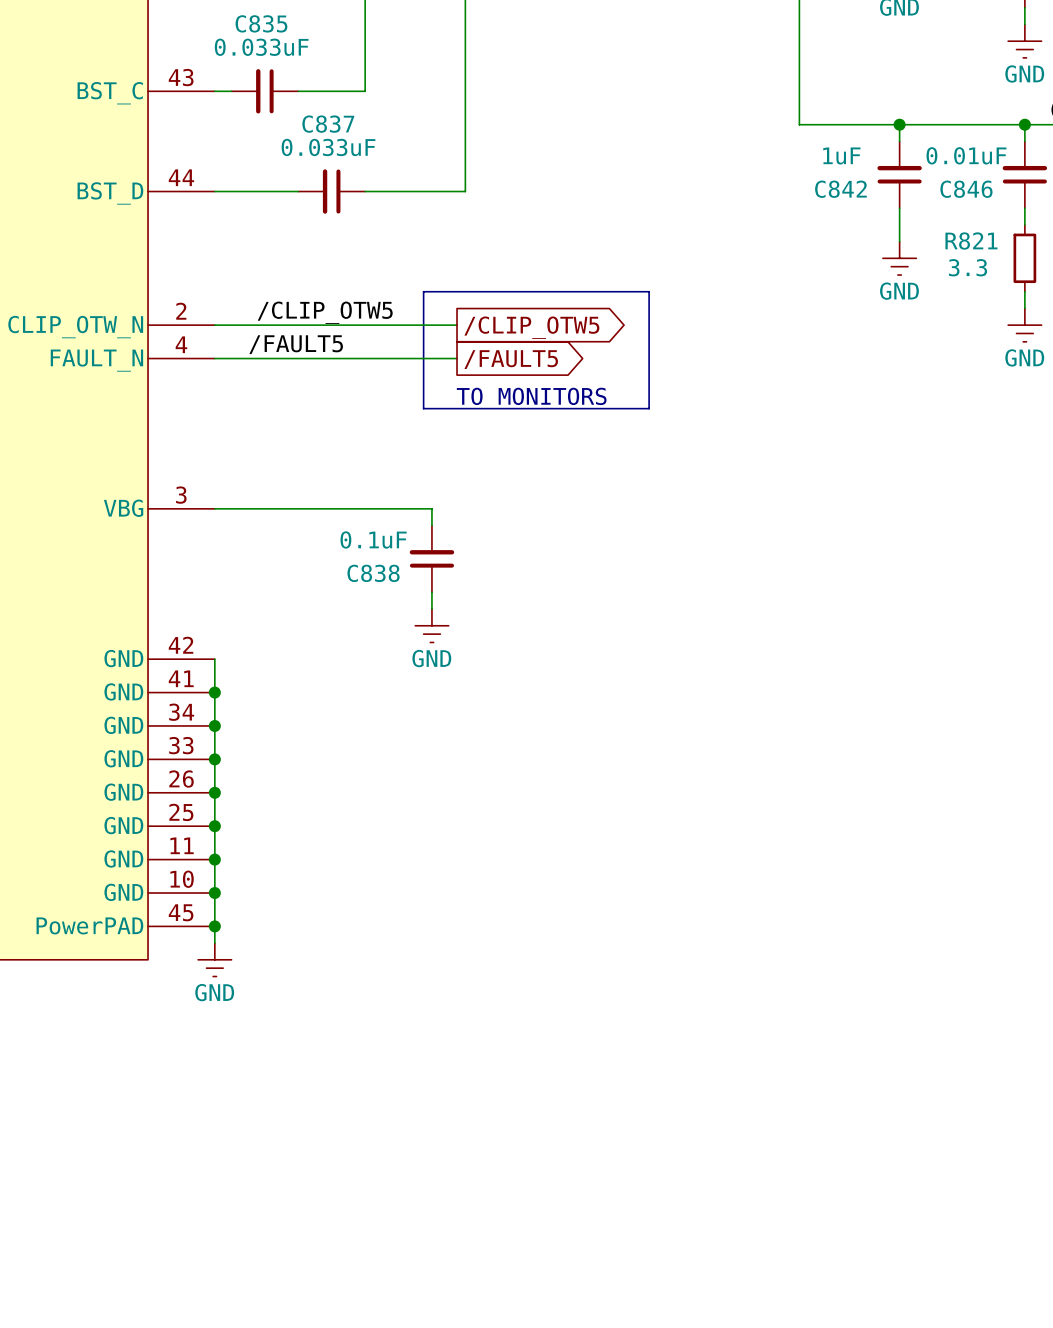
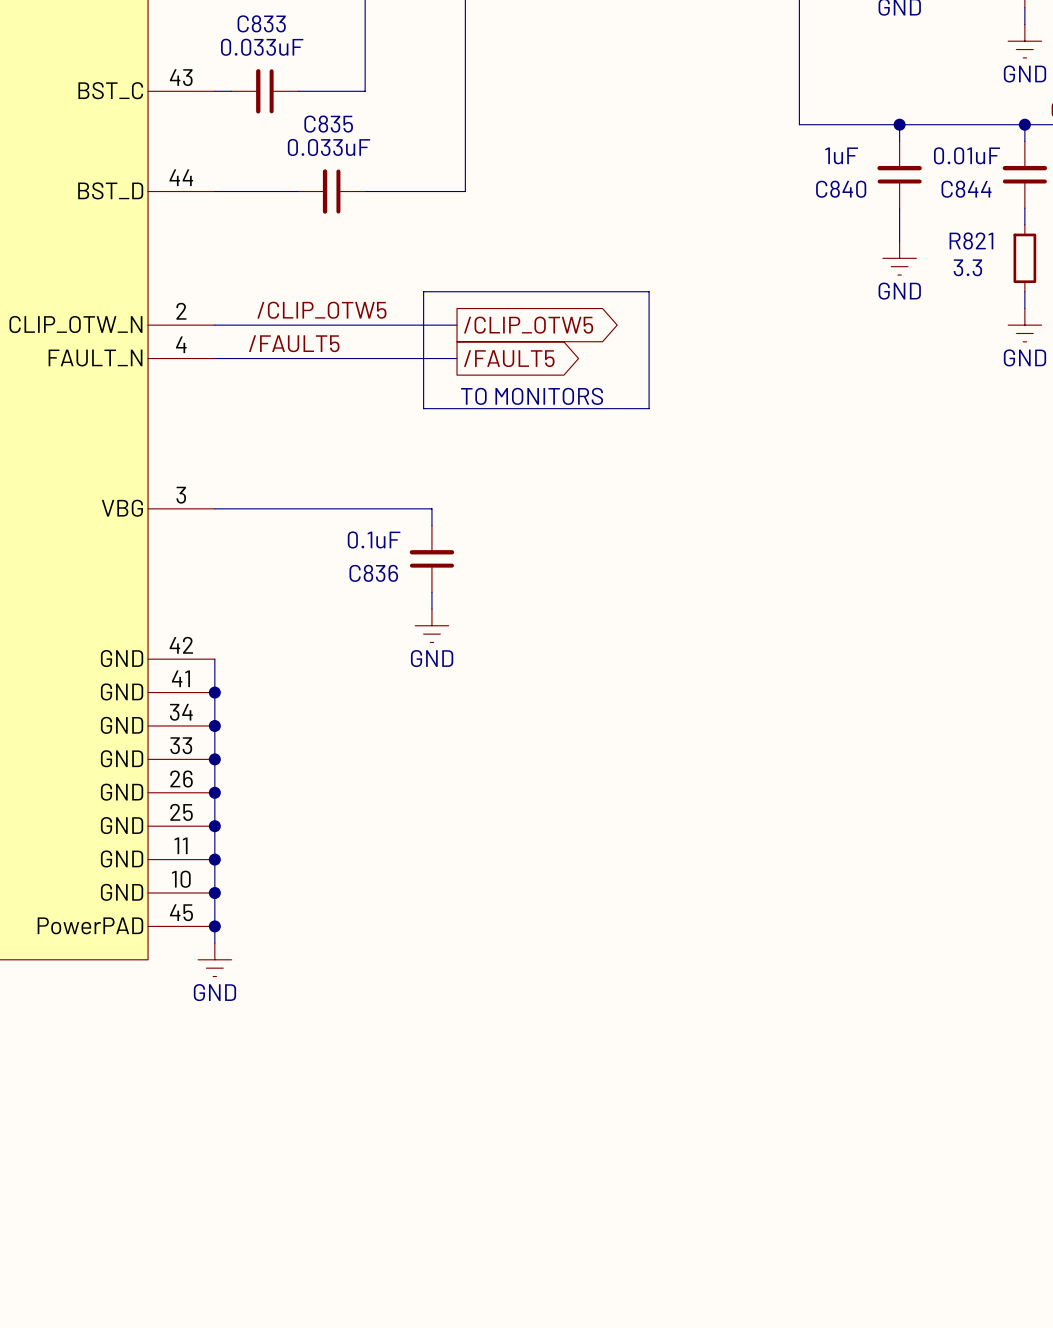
C835 name: C835 (261, 23) -> C833 (261, 23)
C837 name: C837 (328, 124) -> C835 (328, 124)
C842 name: C842 (840, 189) -> C840 (841, 189)
C846 name: C846 (966, 189) -> C844 (966, 189)
C838 name: C838 (373, 573) -> C836 (373, 573)

